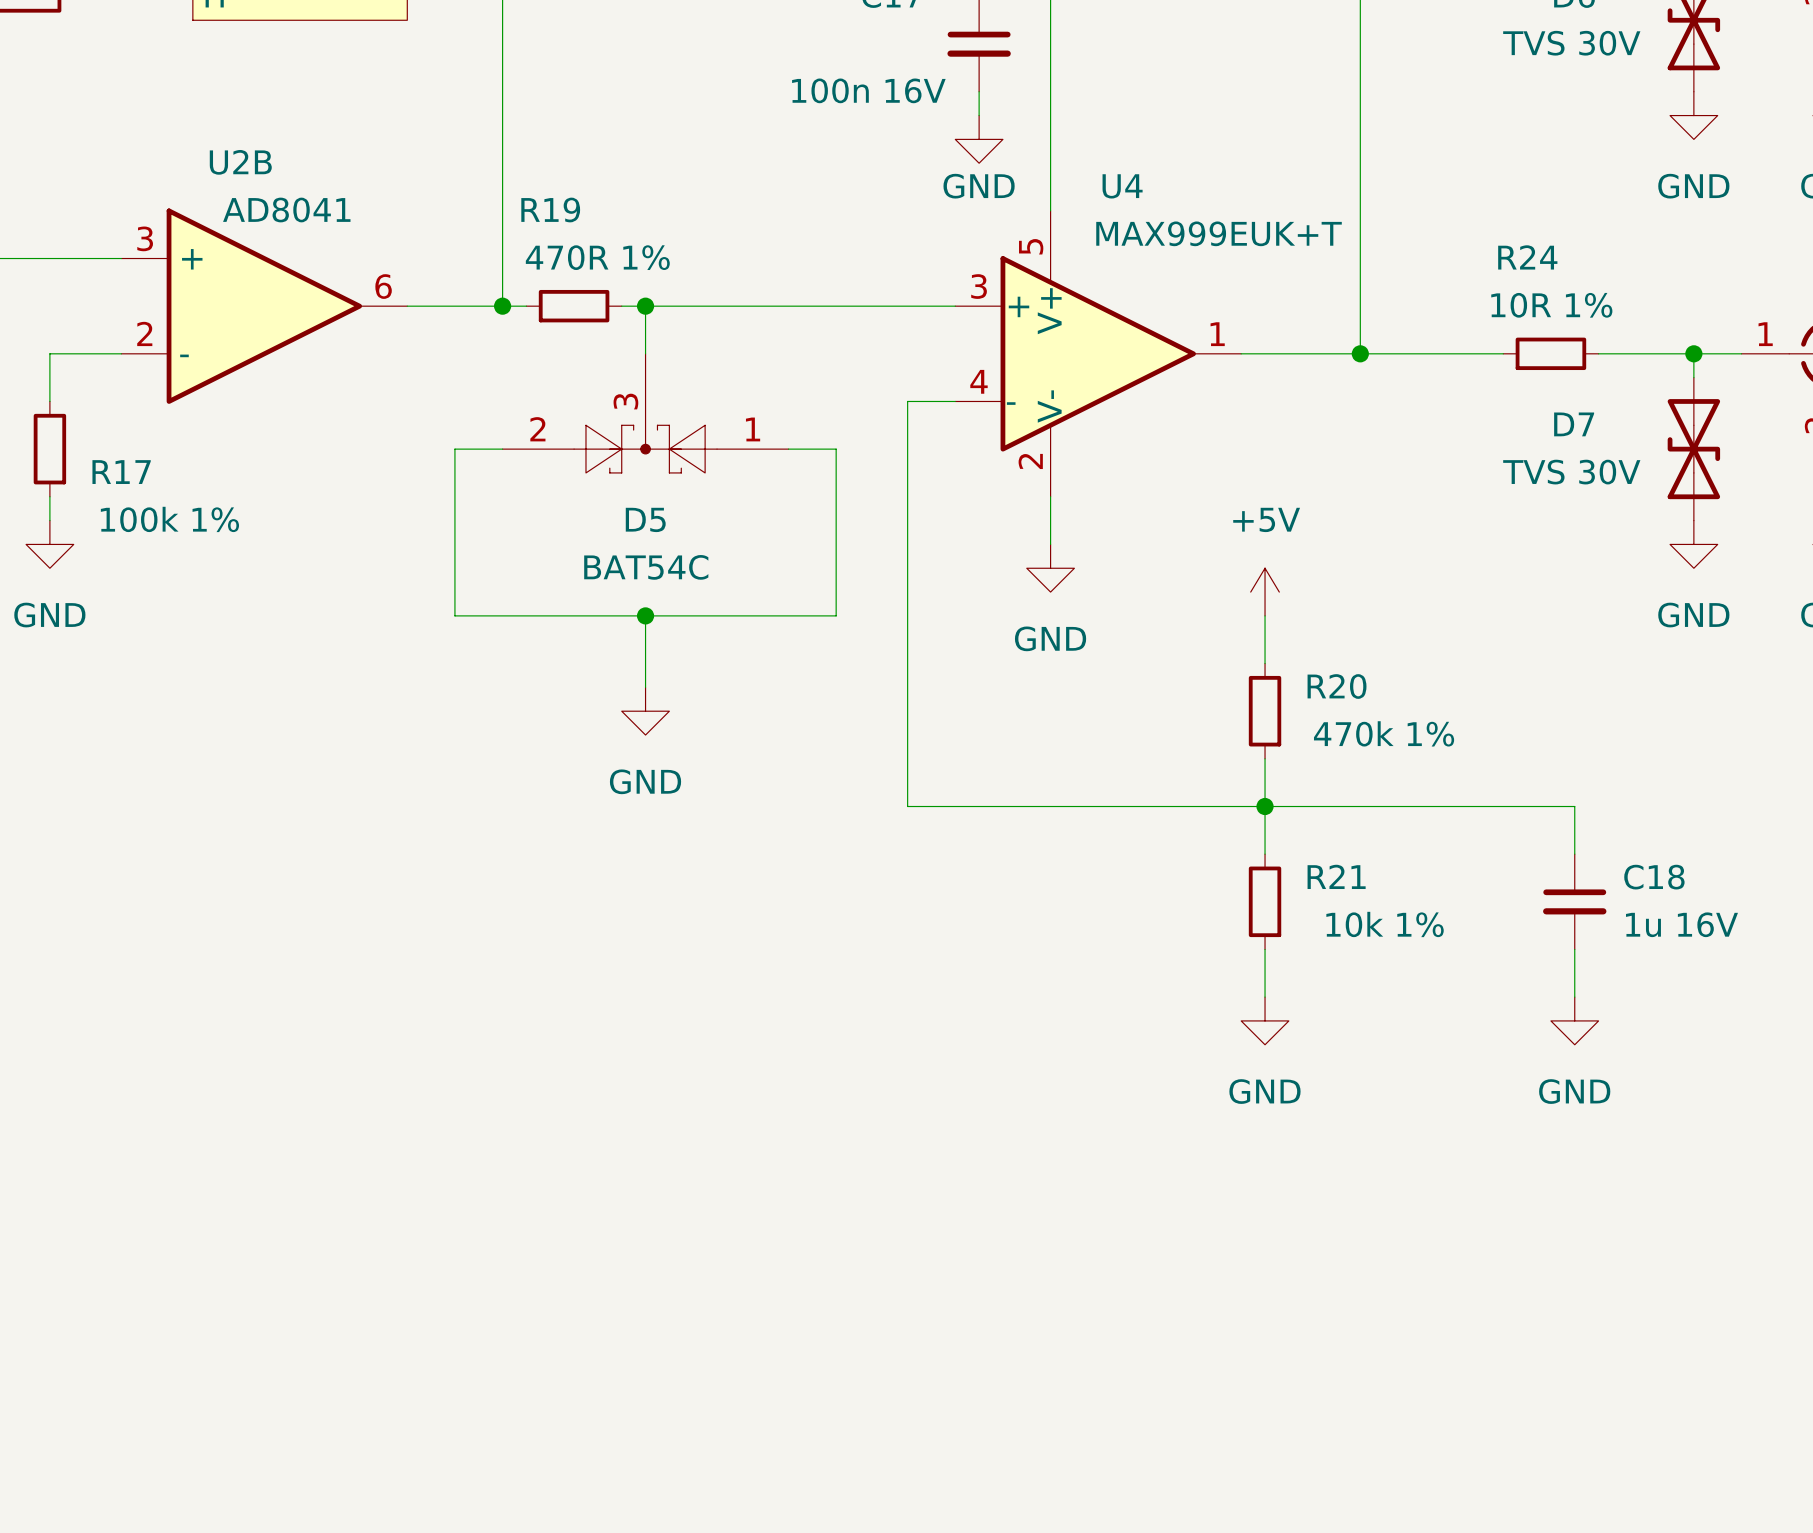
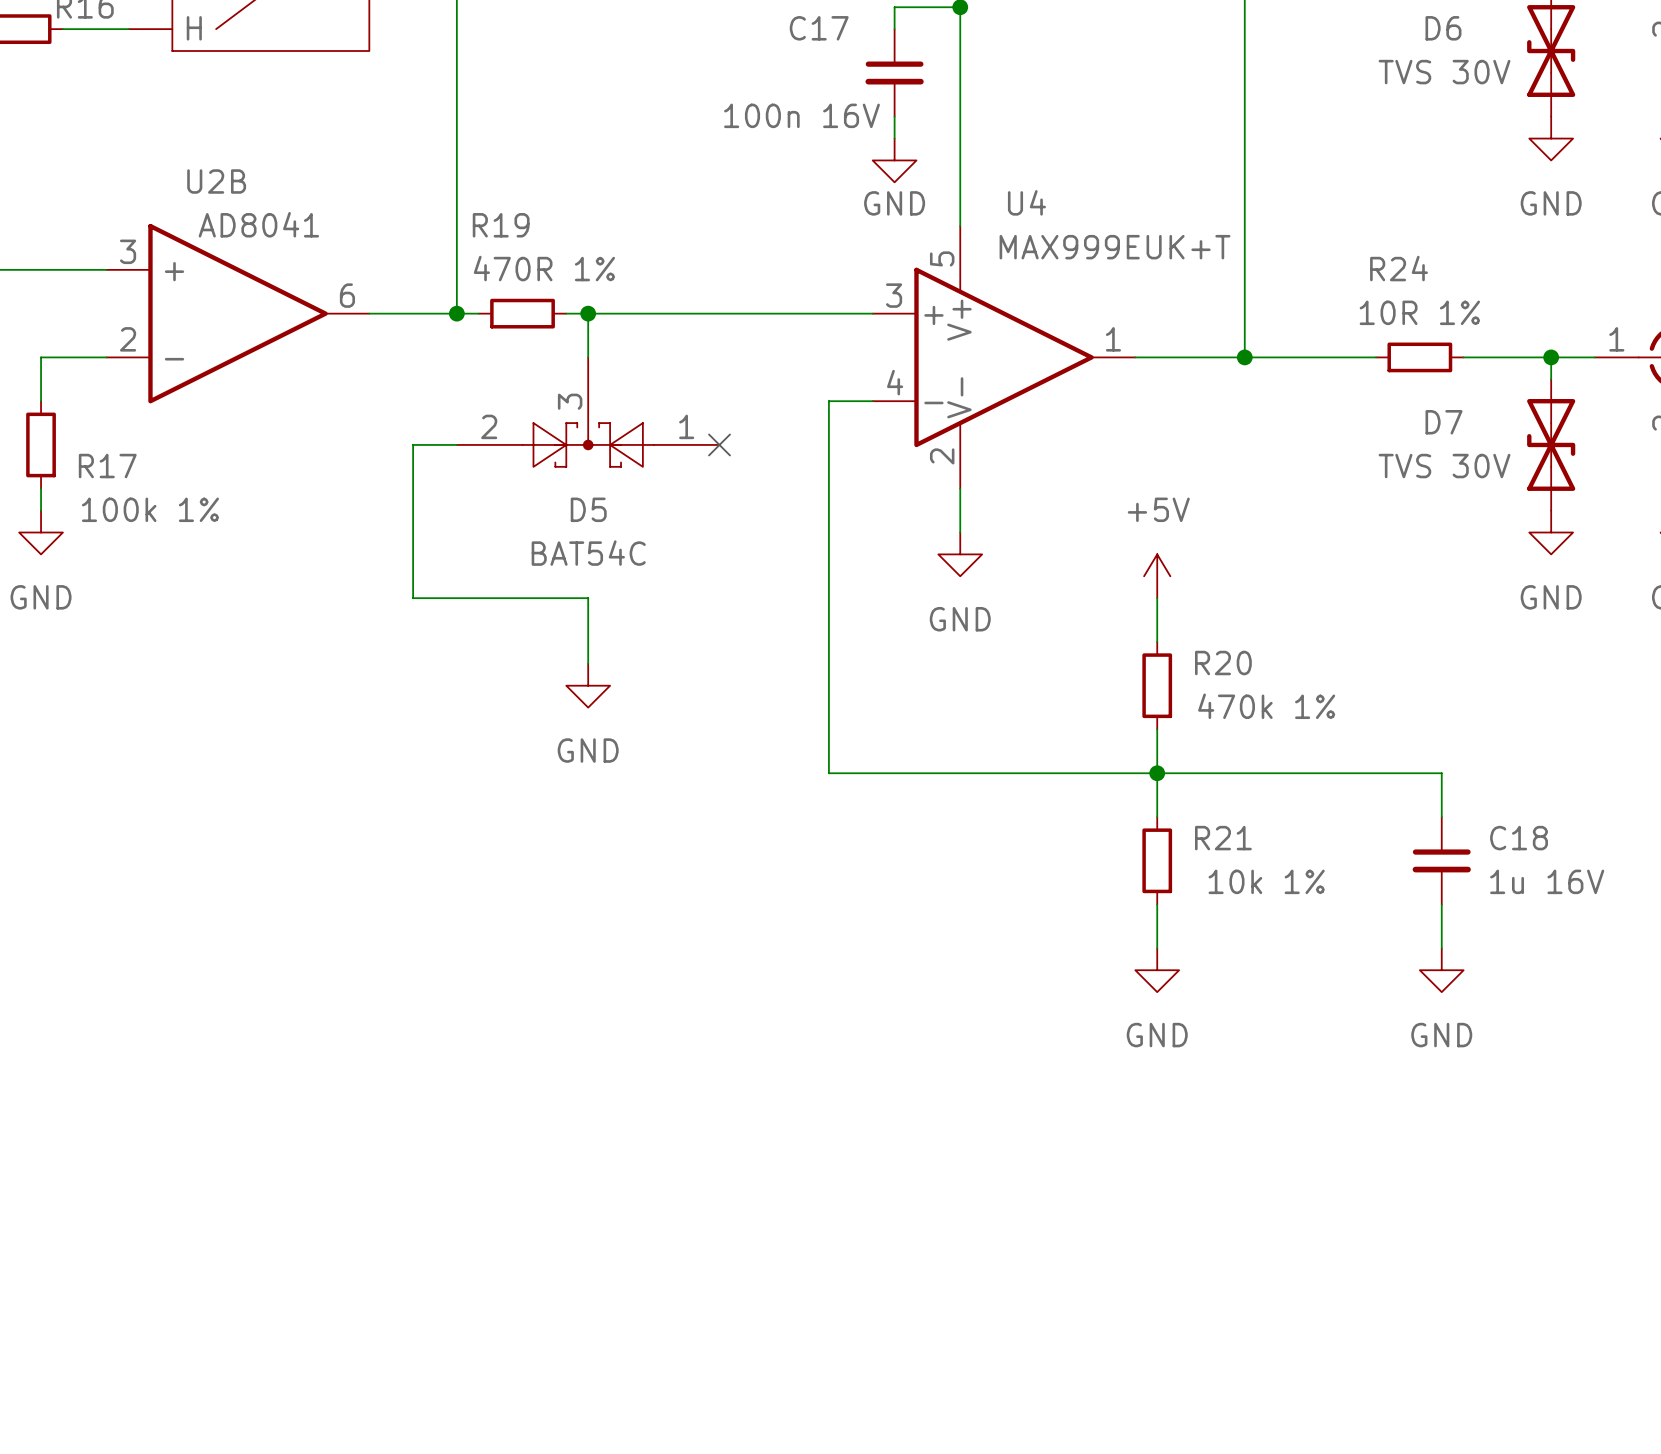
wire: (788, 449) (836, 449) (836, 615) (645, 615) -> none
no-connect mark: none -> (719, 444)
junction: (645, 615) -> none

